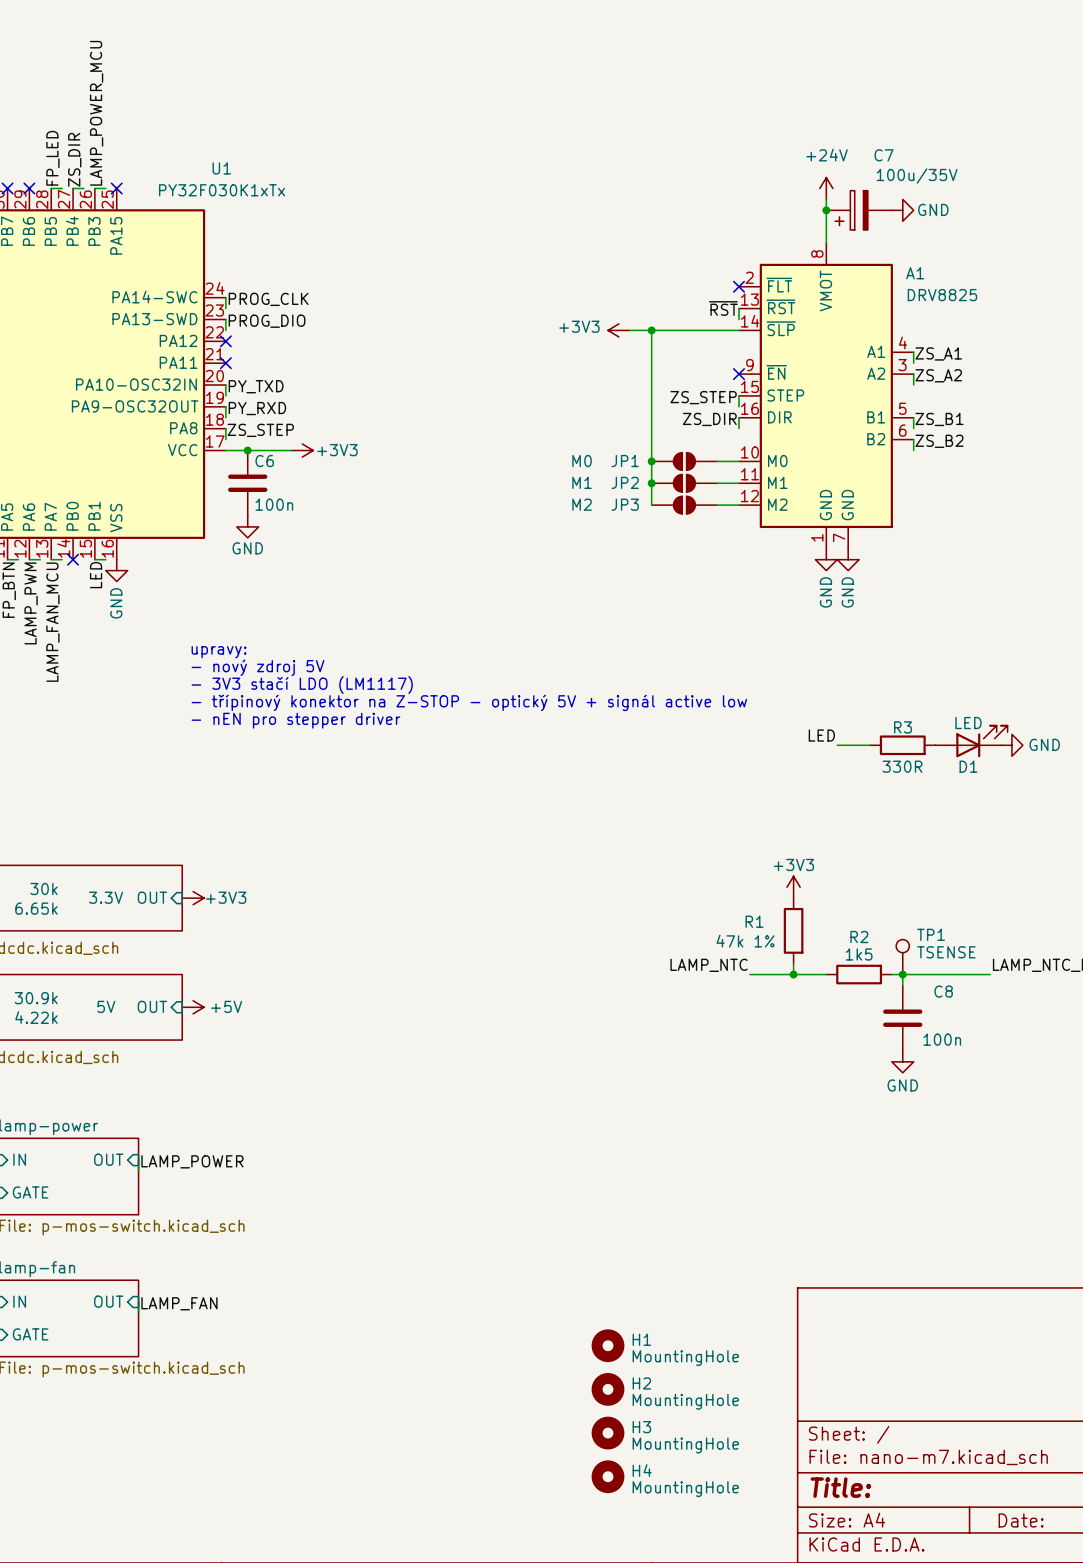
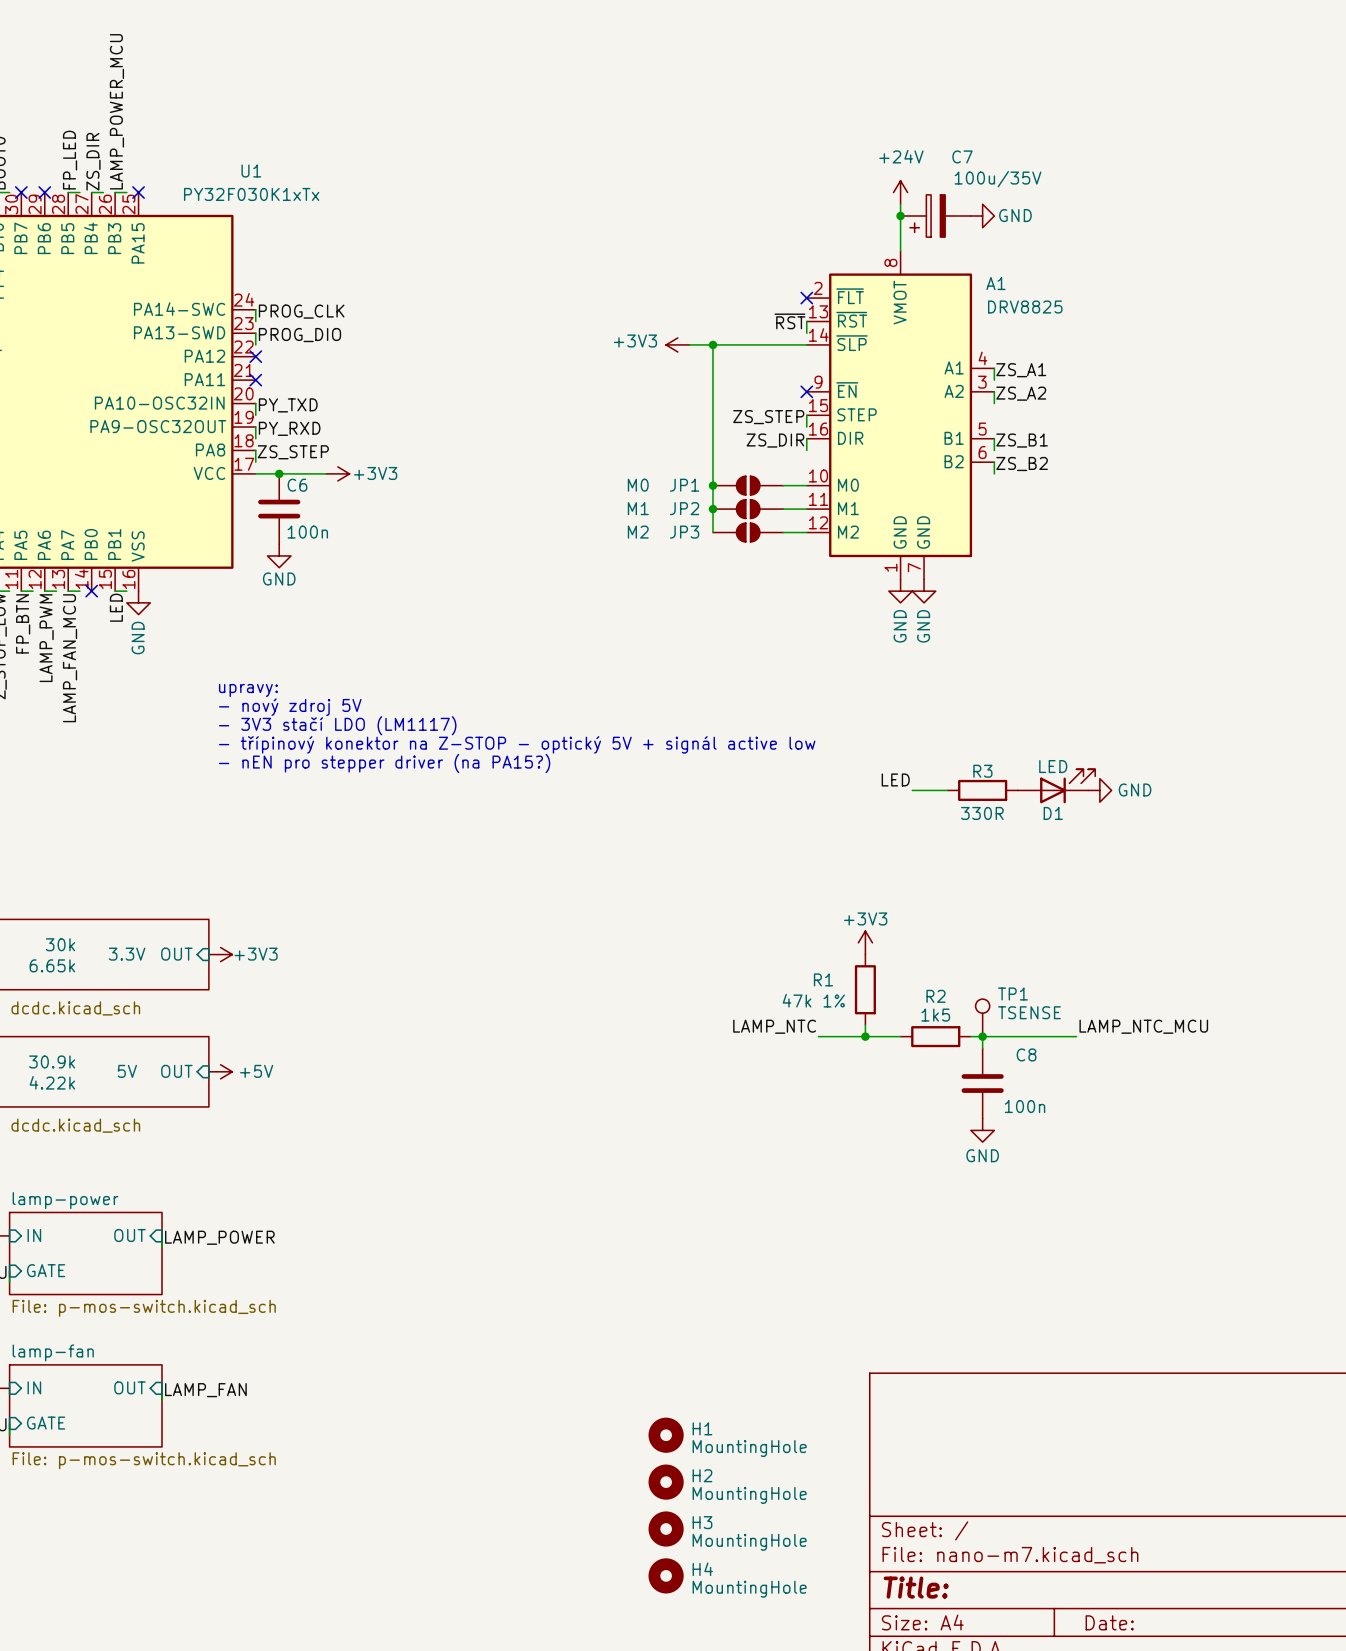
text: - nEN pro stepper driver (295, 720) -> - nEN pro stepper driver (na PA15?) (384, 763)

